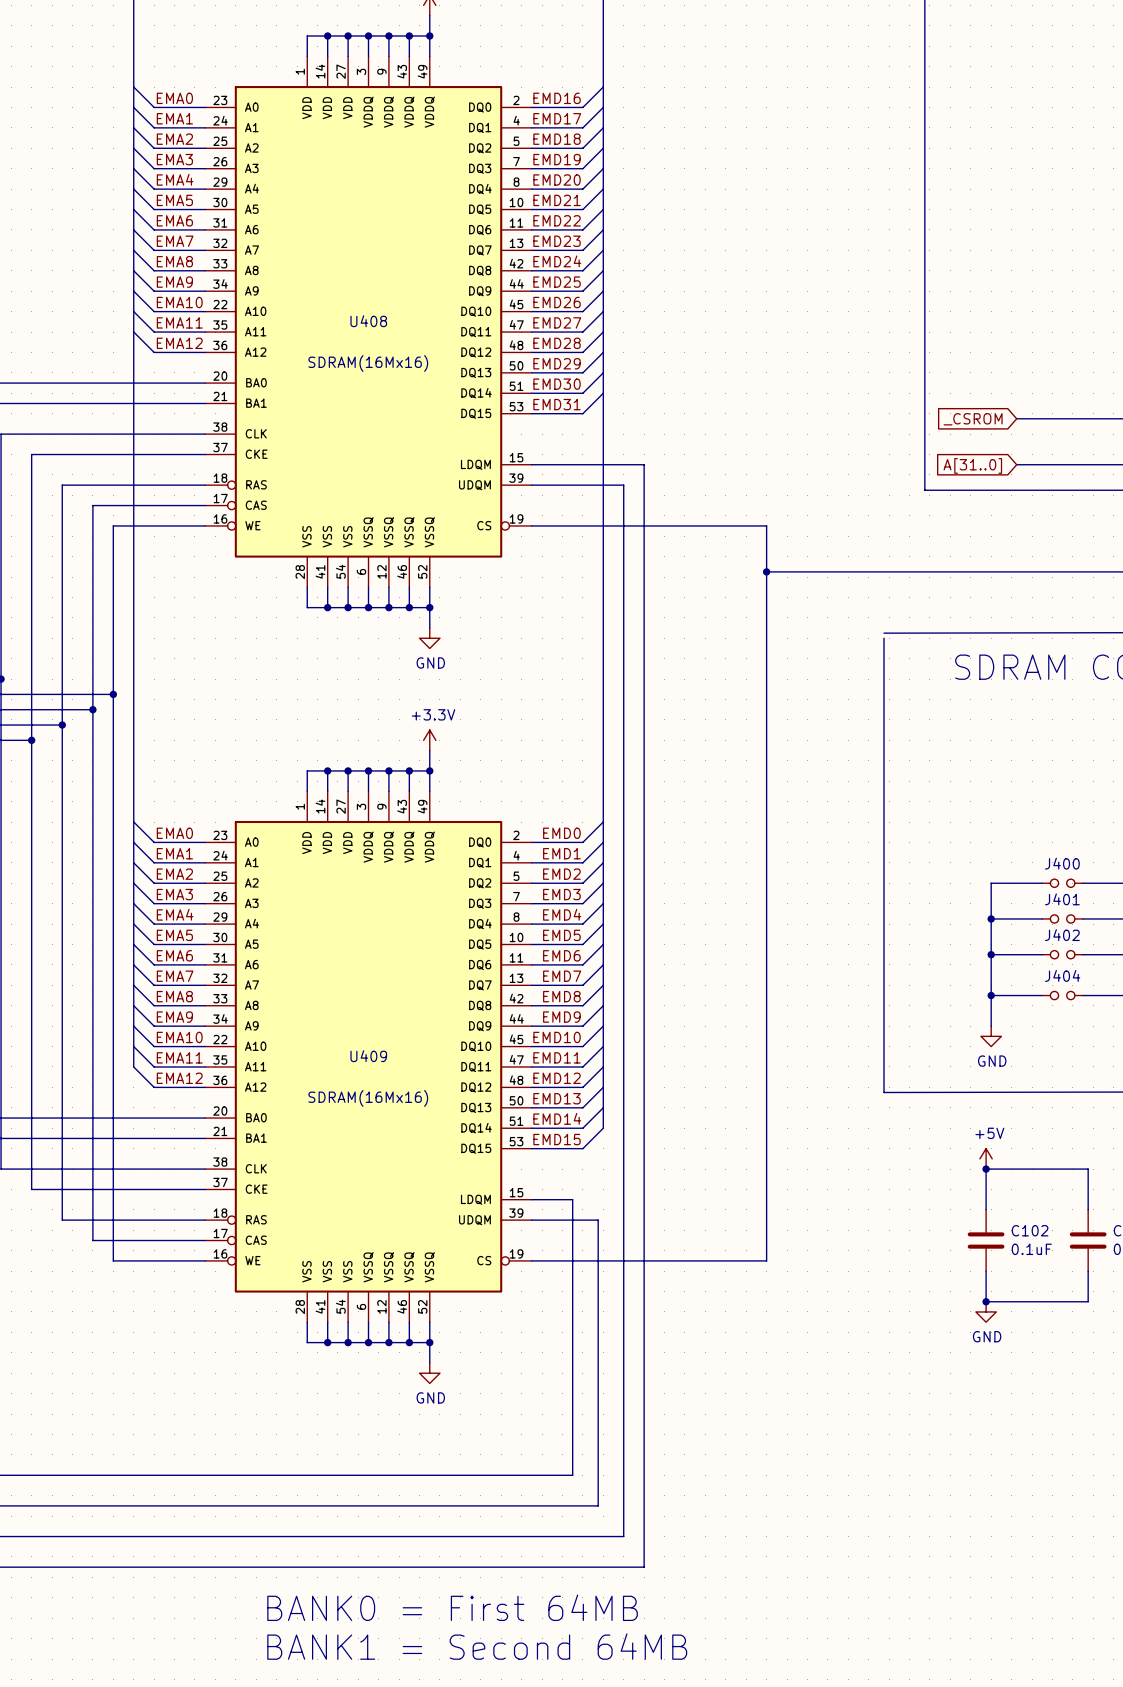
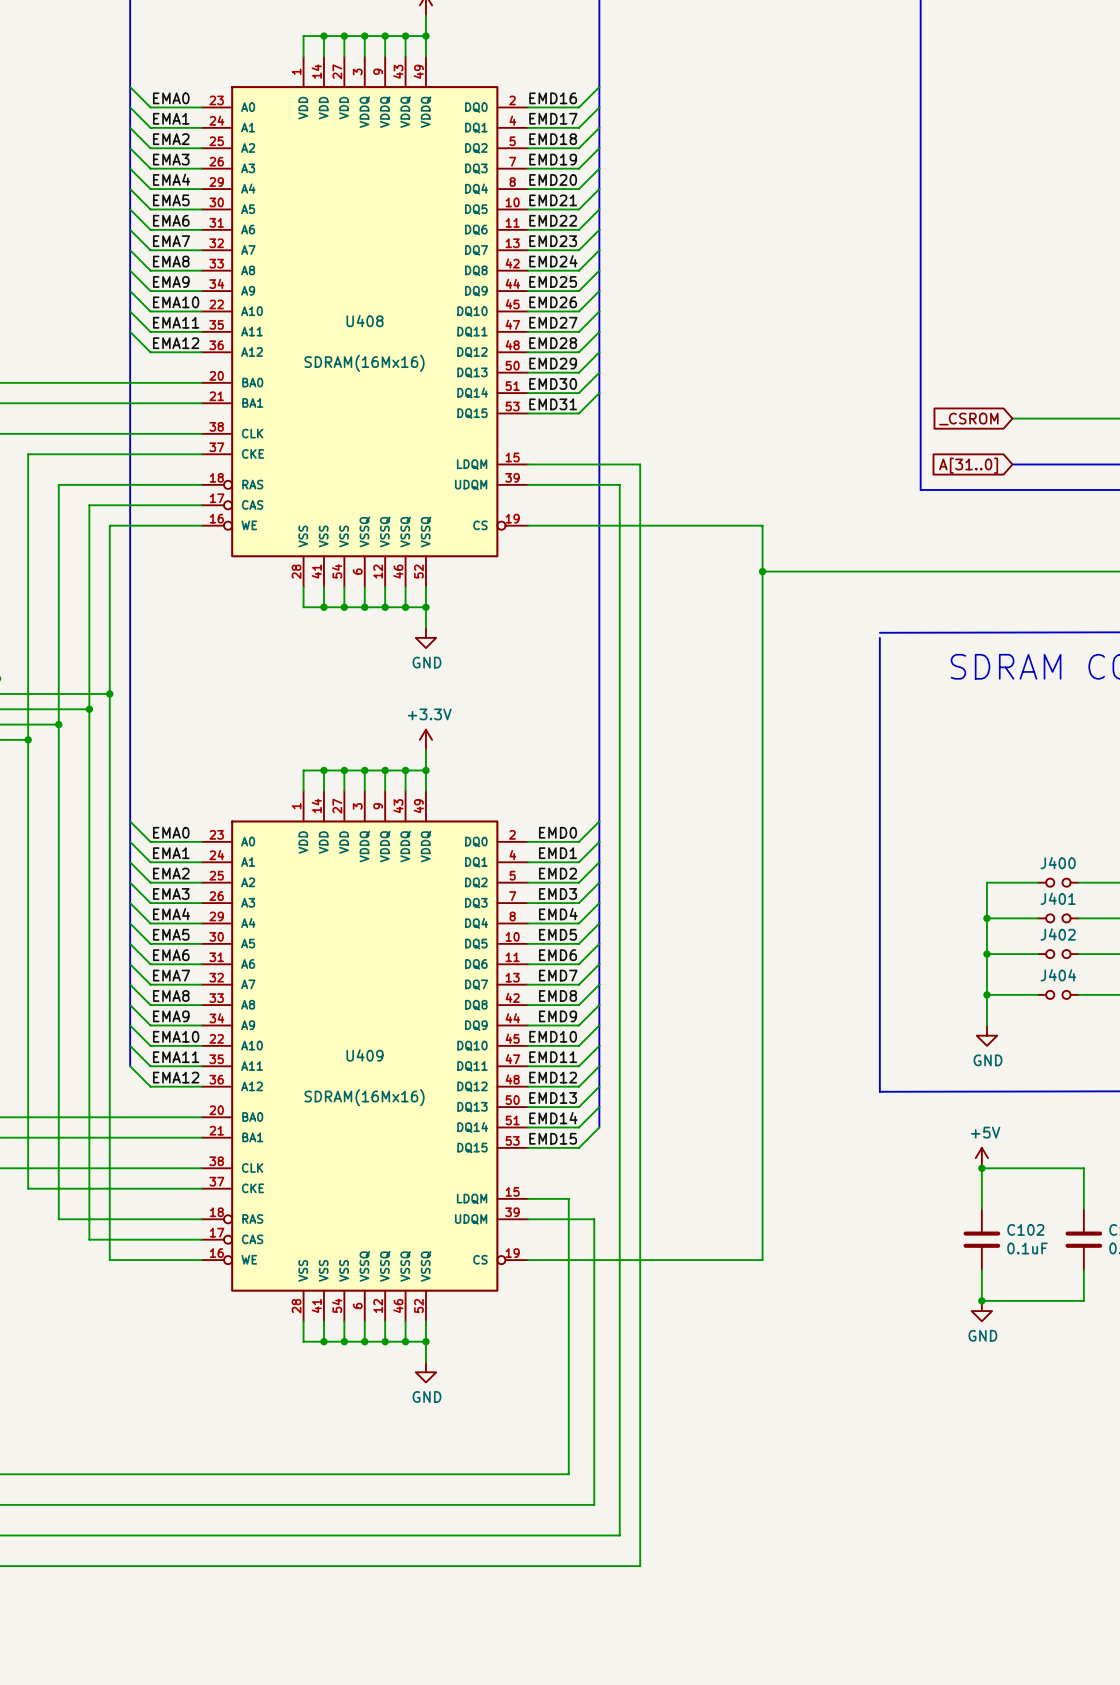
text: BANK0 = First 64MB (452, 1607) -> none
text: BANK1 = Second 64MB (477, 1646) -> none

